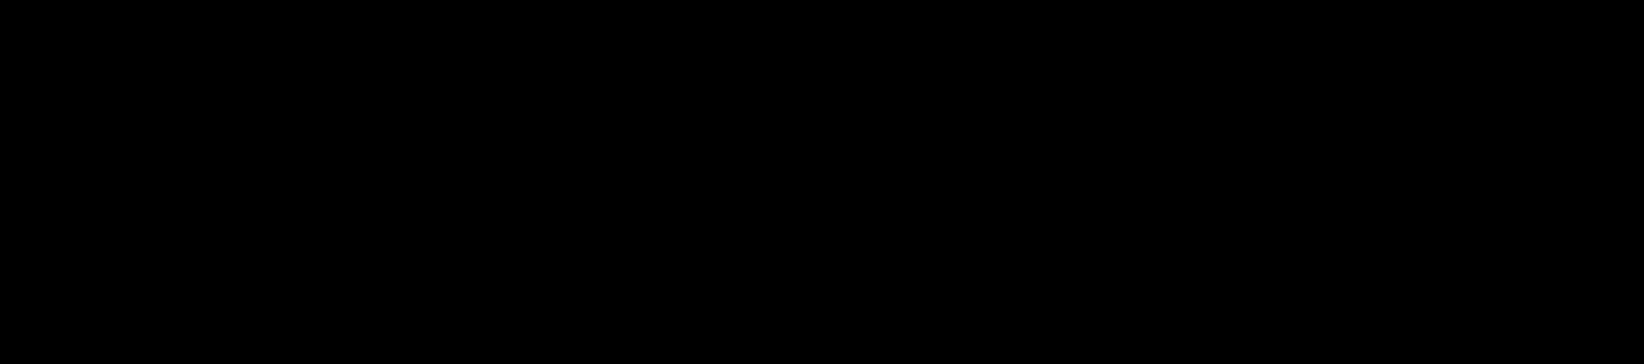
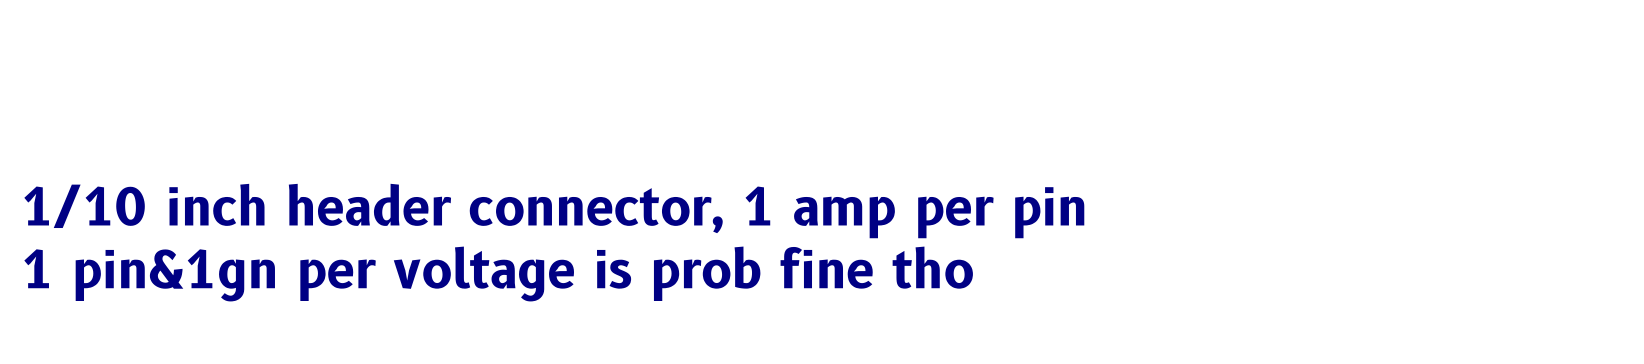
text: none -> 1/10 inch header connector, 1 amp per pin (554, 211)
text: none -> 1 pin&1gn per voltage is prob fine tho (498, 273)

